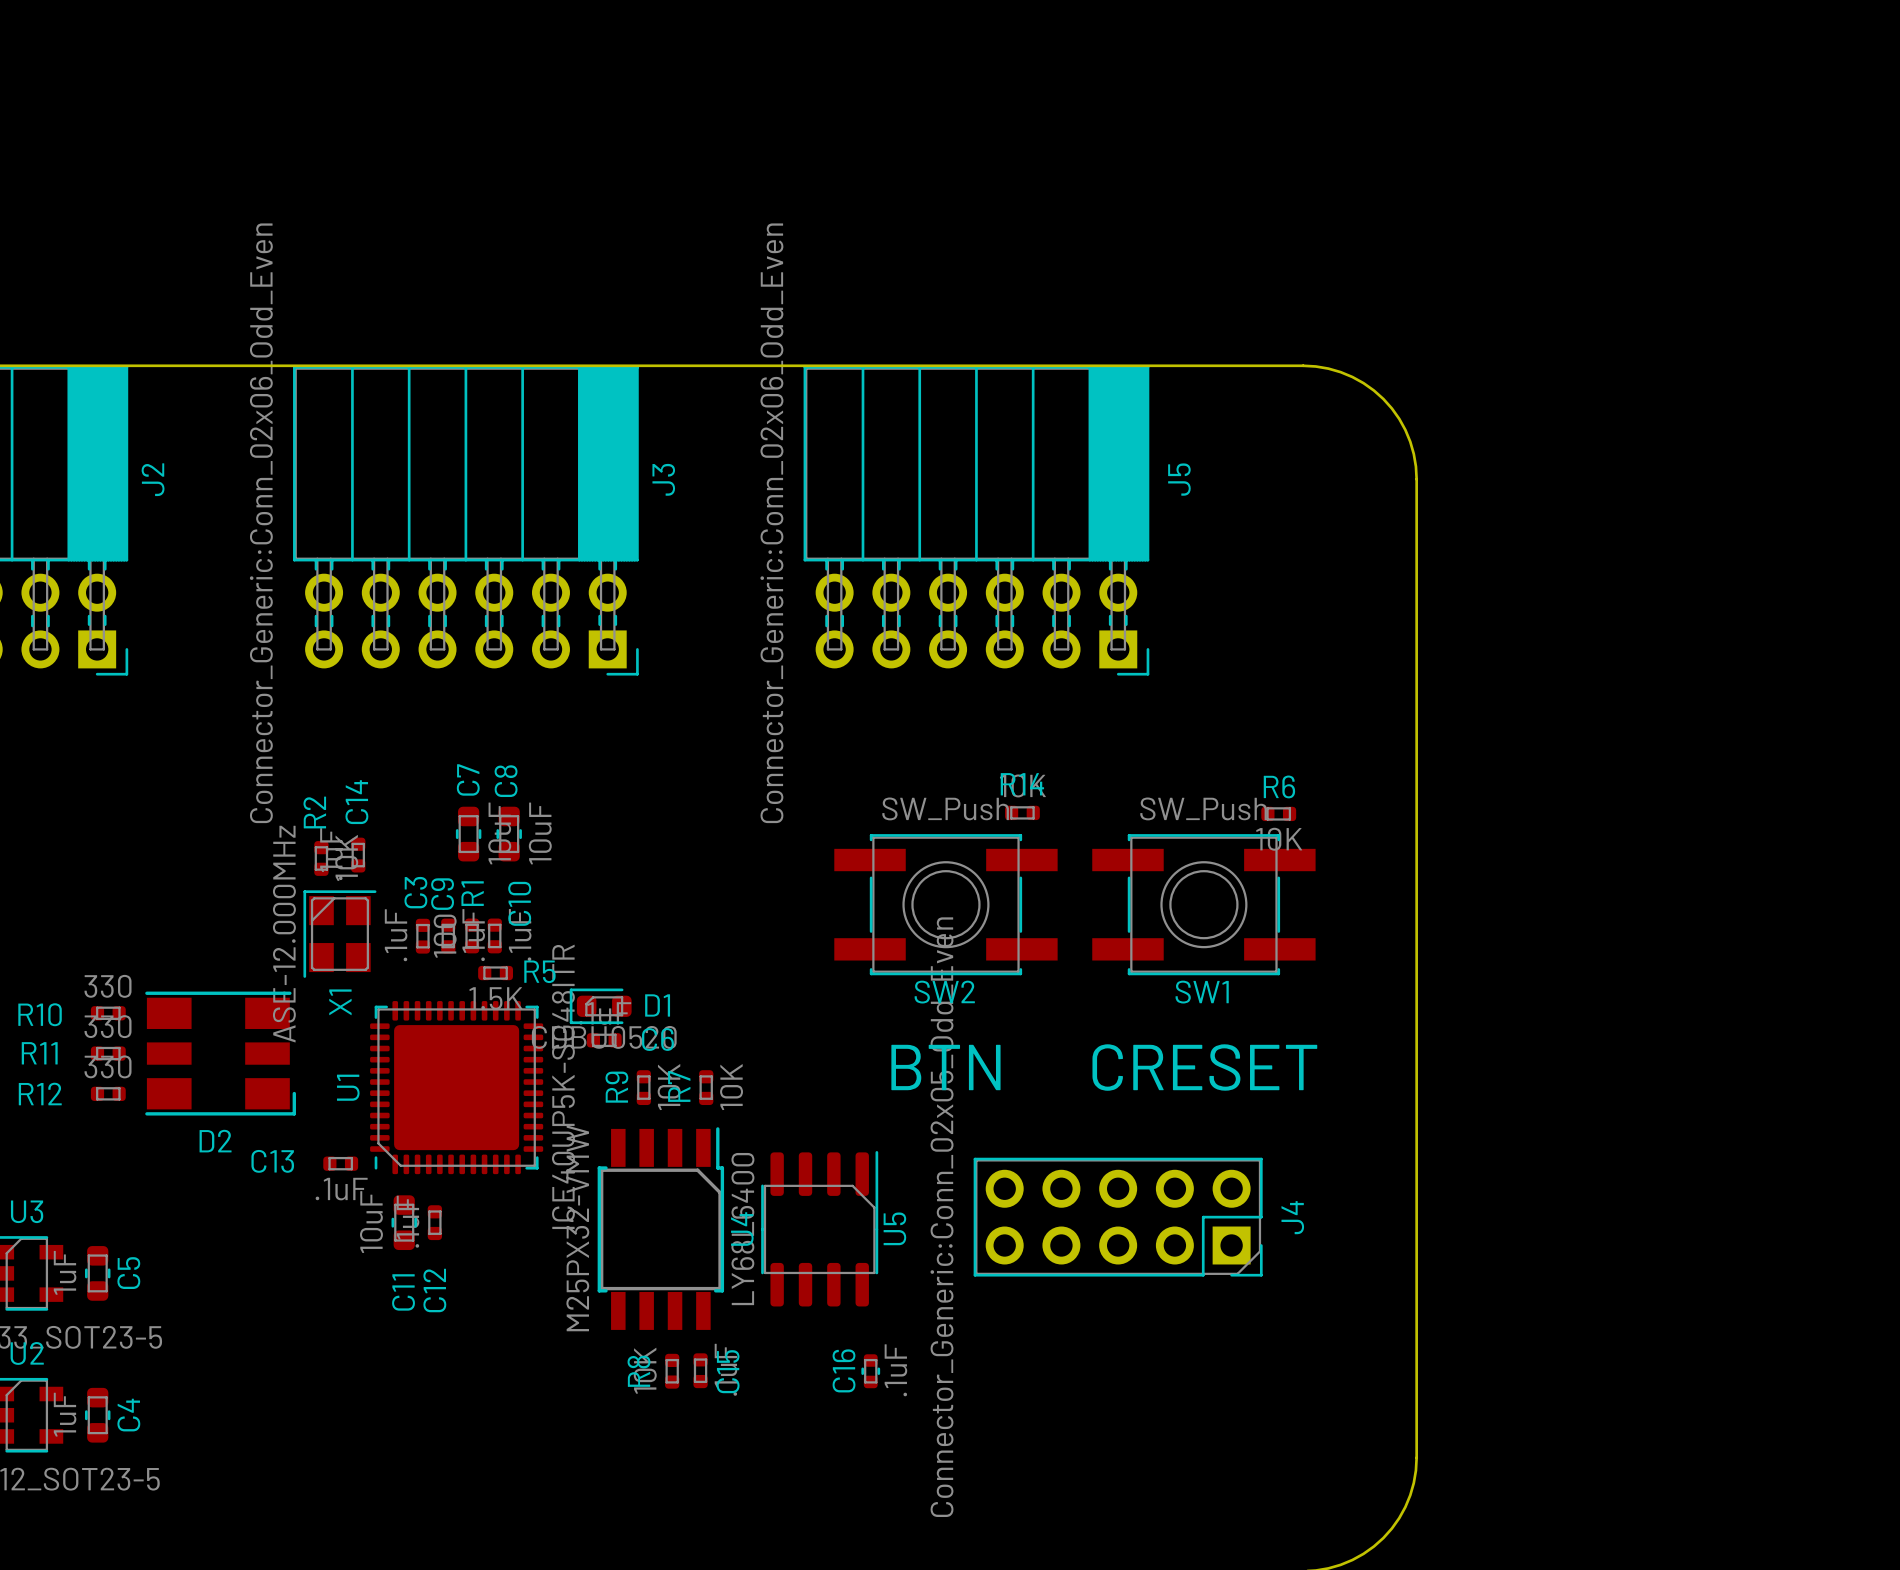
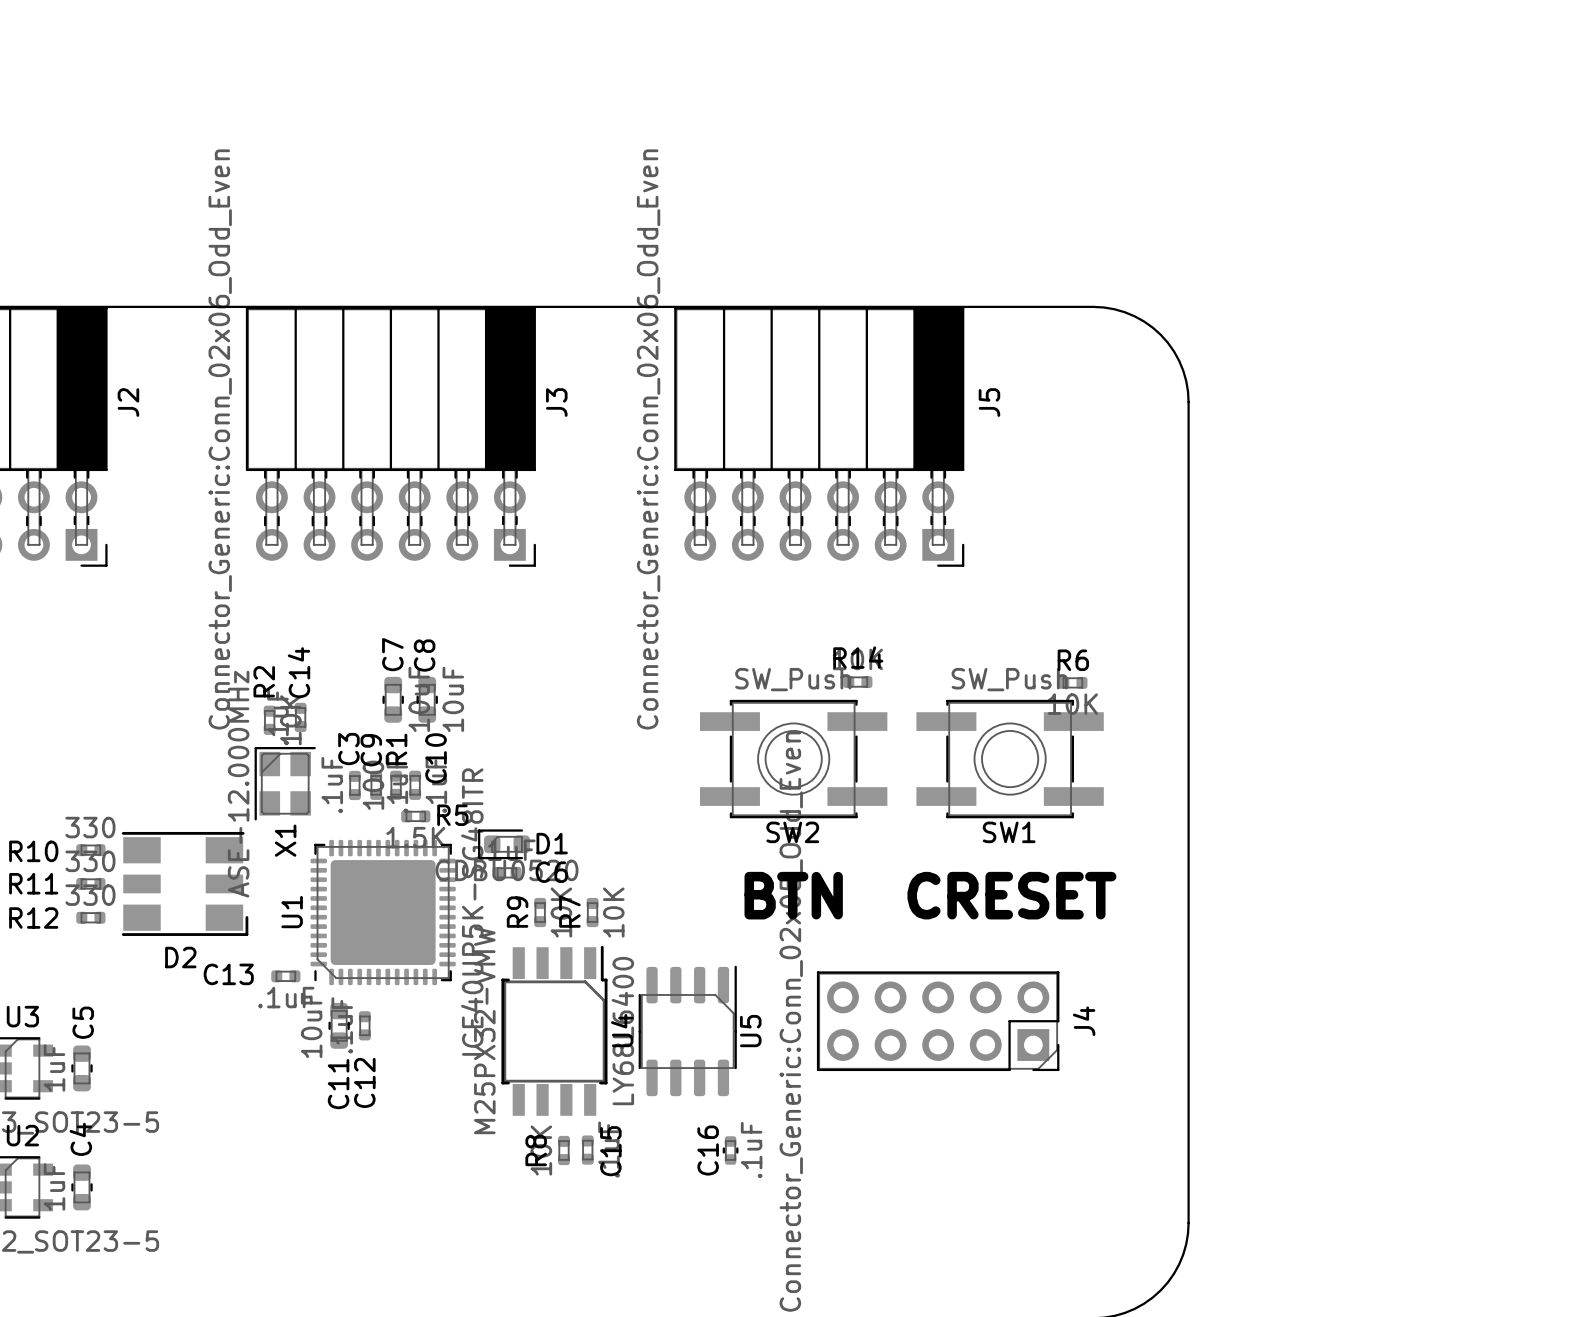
C5 name position: C5 (128, 1273) -> C5 (83, 1022)
C4 name position: C4 (128, 1415) -> C4 (80, 1139)

